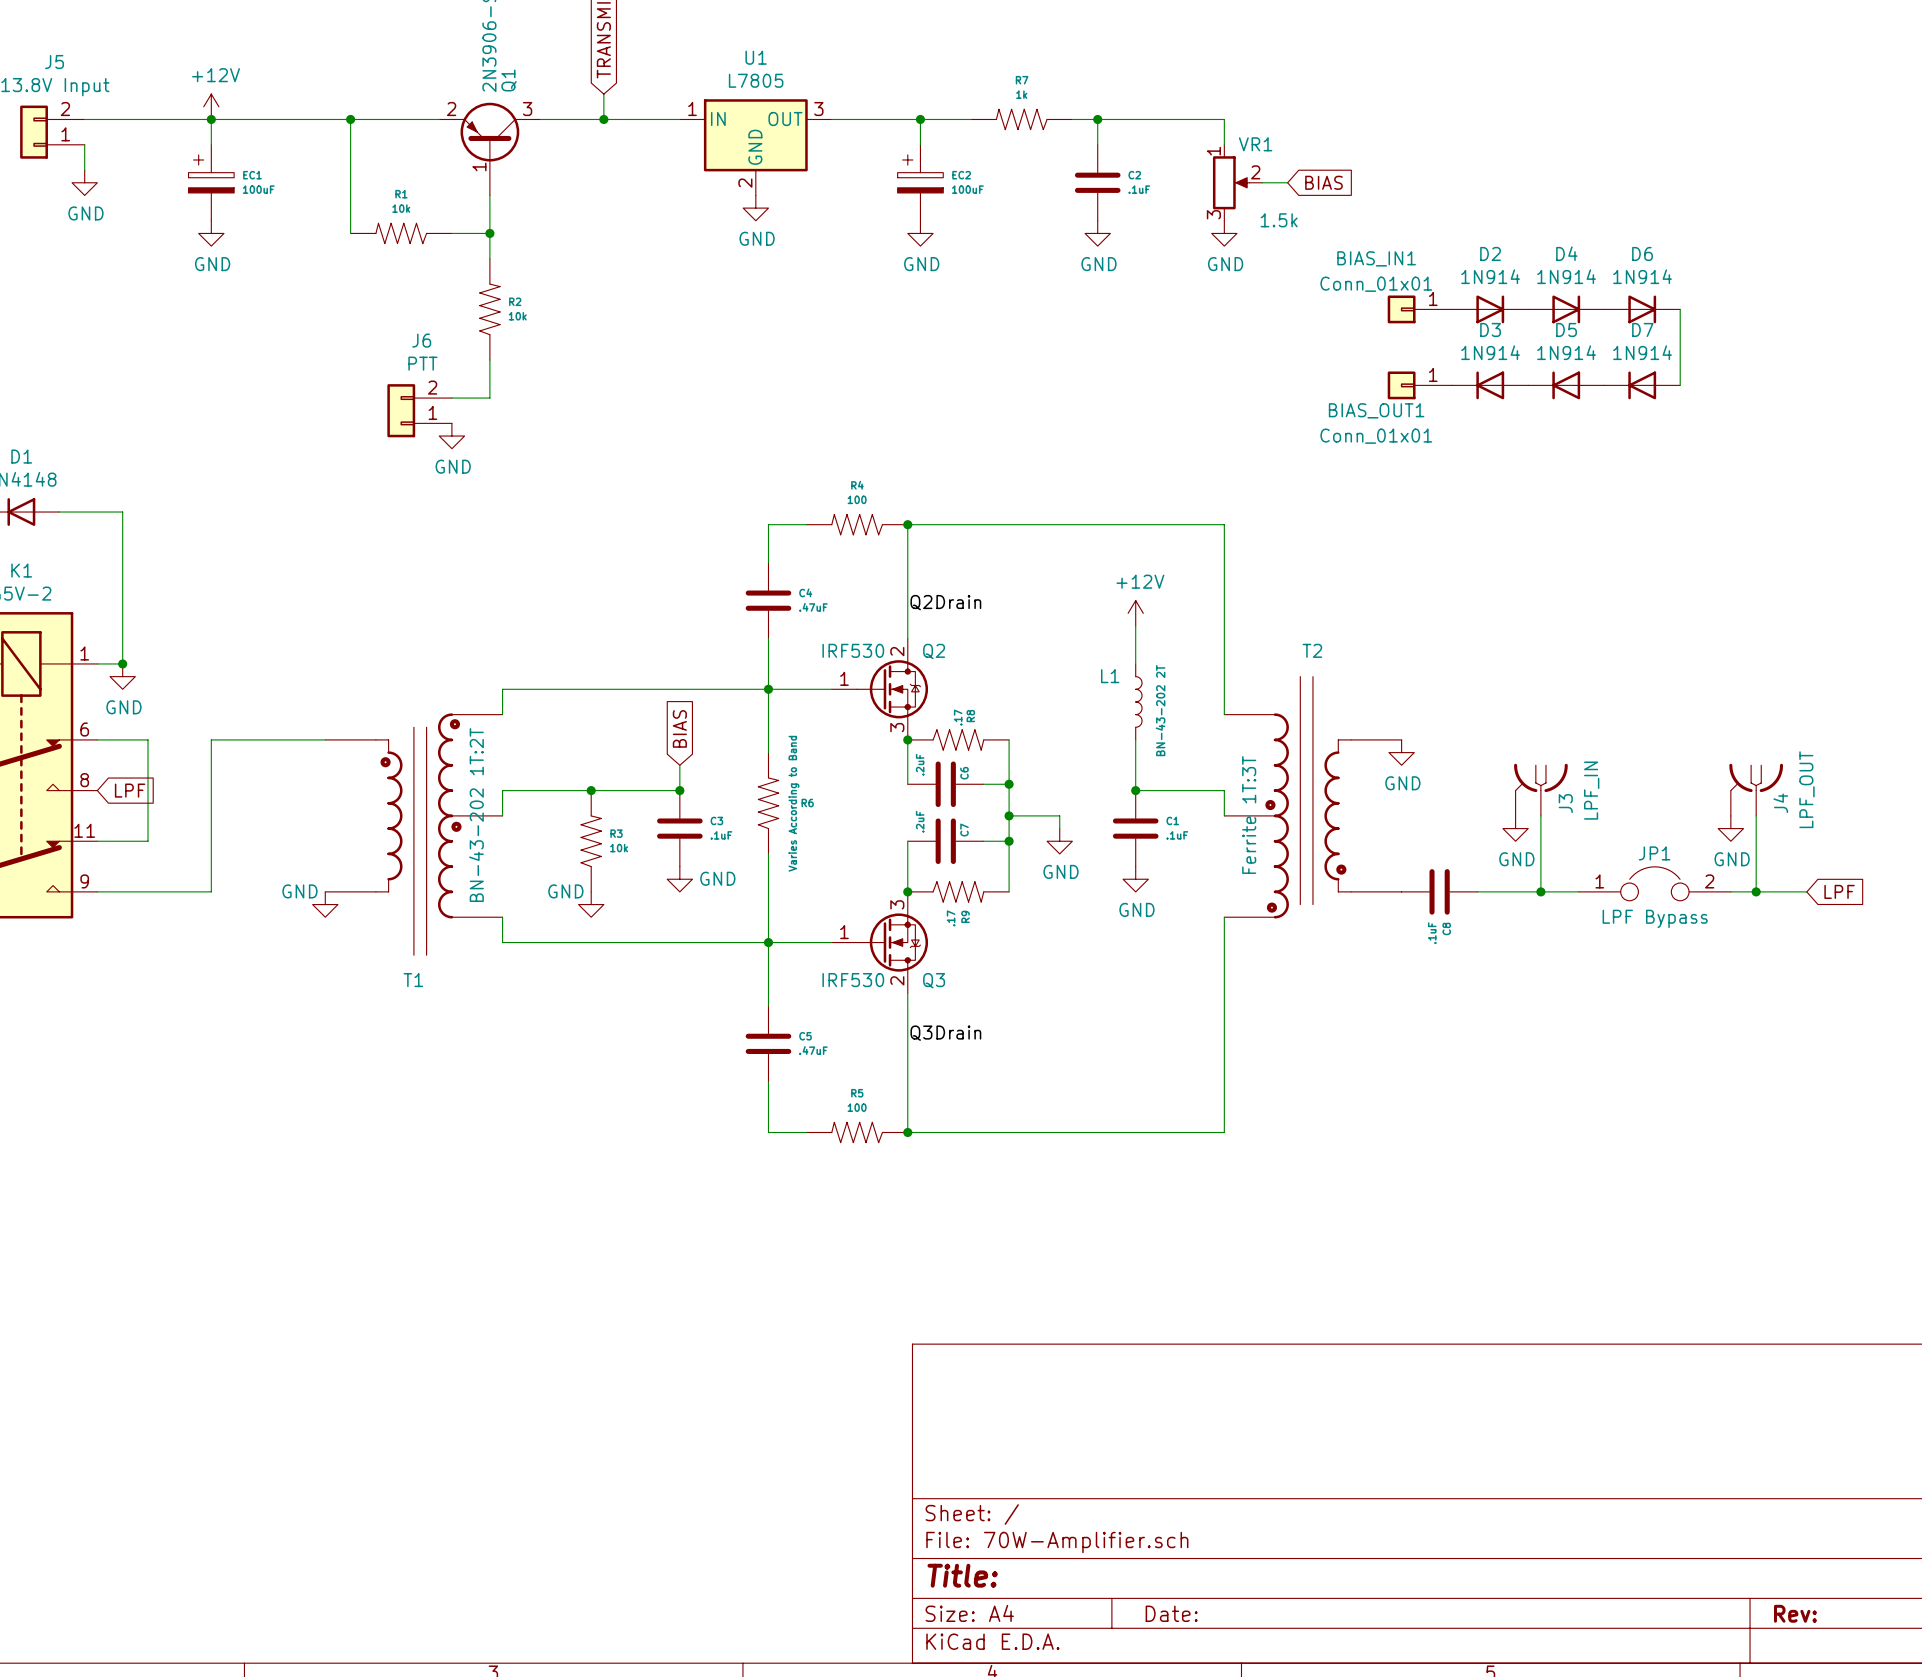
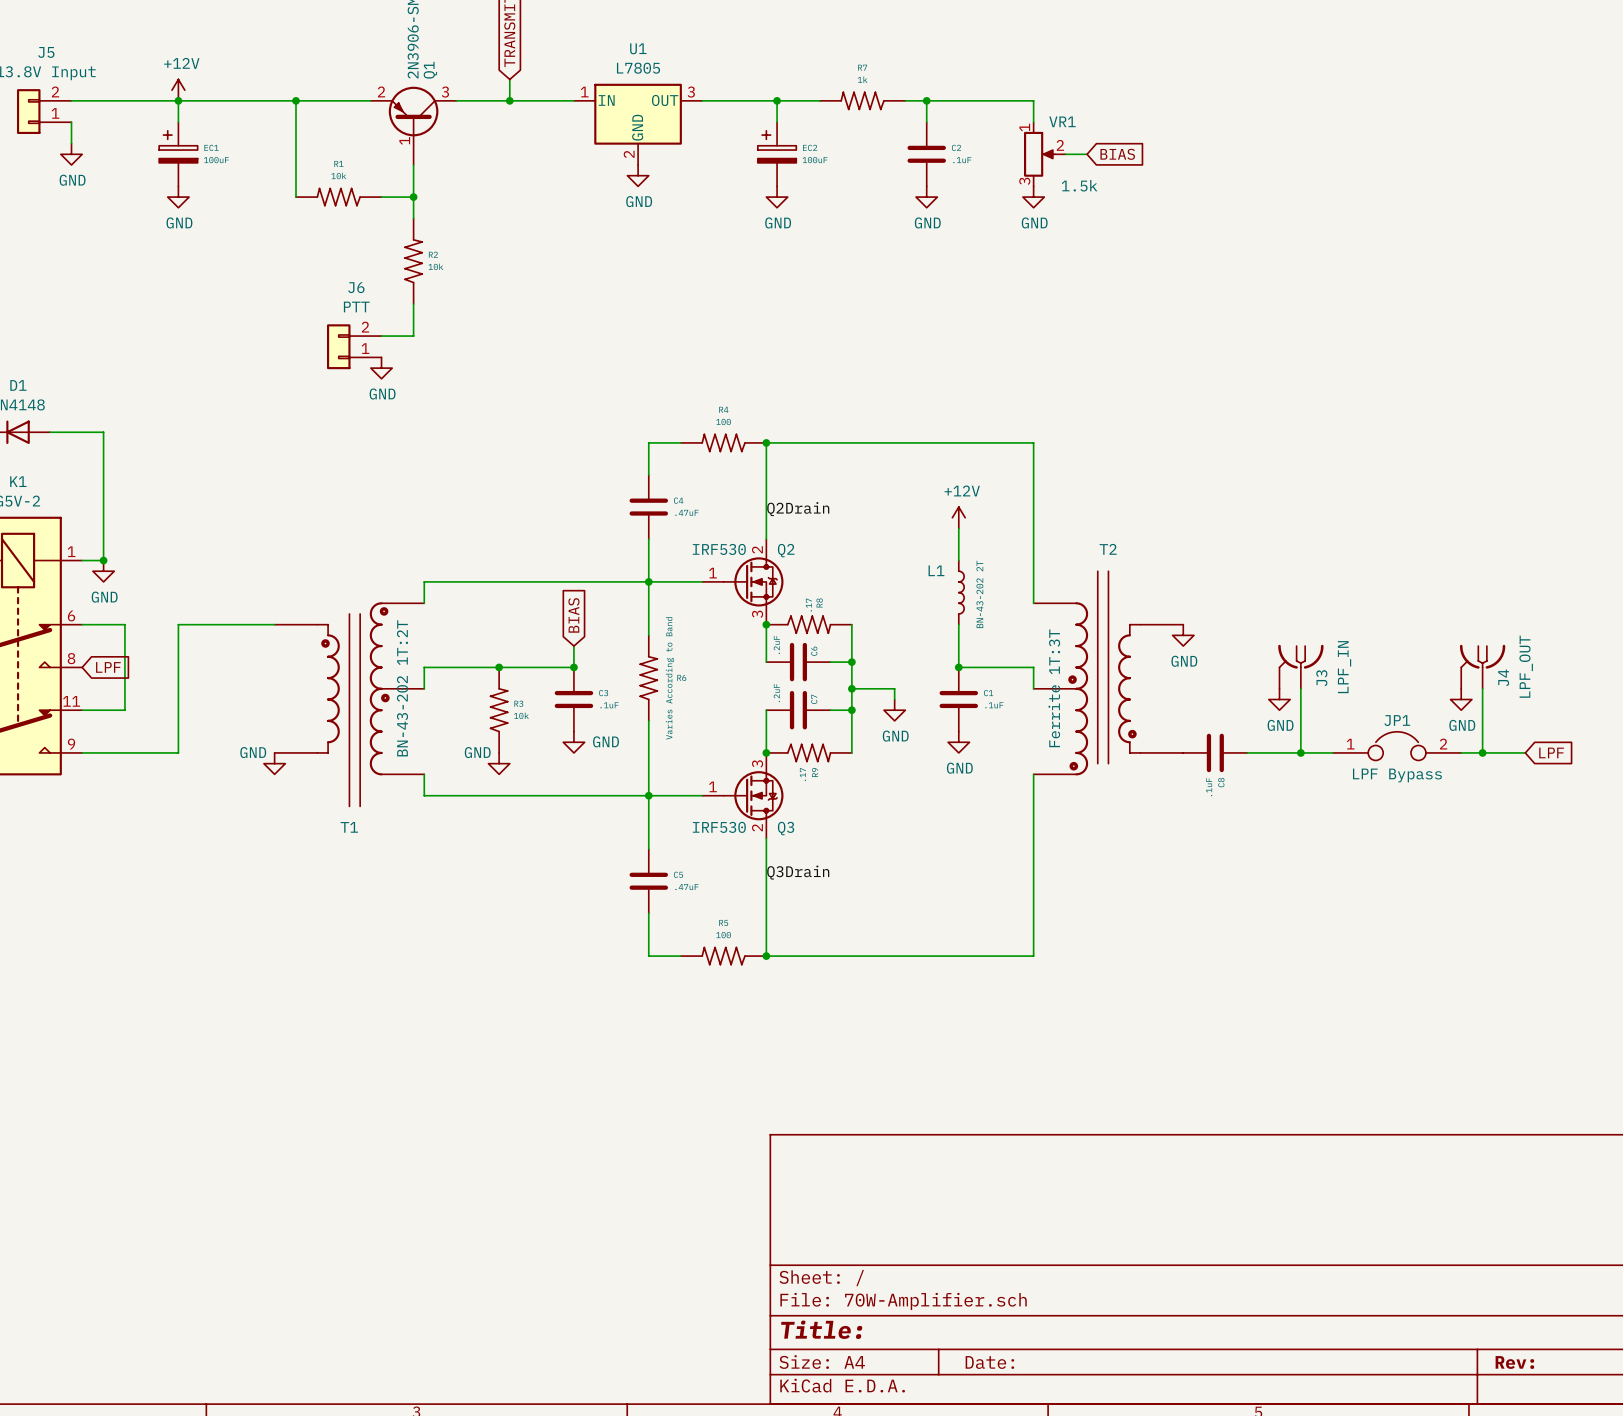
BIAS_IN1: Conn_01x01 (1419, 309) -> none
D2: 1N914 (1490, 309) -> none
D4: 1N914 (1566, 309) -> none
D6: 1N914 (1642, 309) -> none
wire: (1680, 309) (1680, 385) -> none
BIAS_OUT1: Conn_01x01 (1419, 385) -> none
D3: 1N914 (1490, 385) -> none
D5: 1N914 (1566, 385) -> none
D7: 1N914 (1642, 385) -> none

